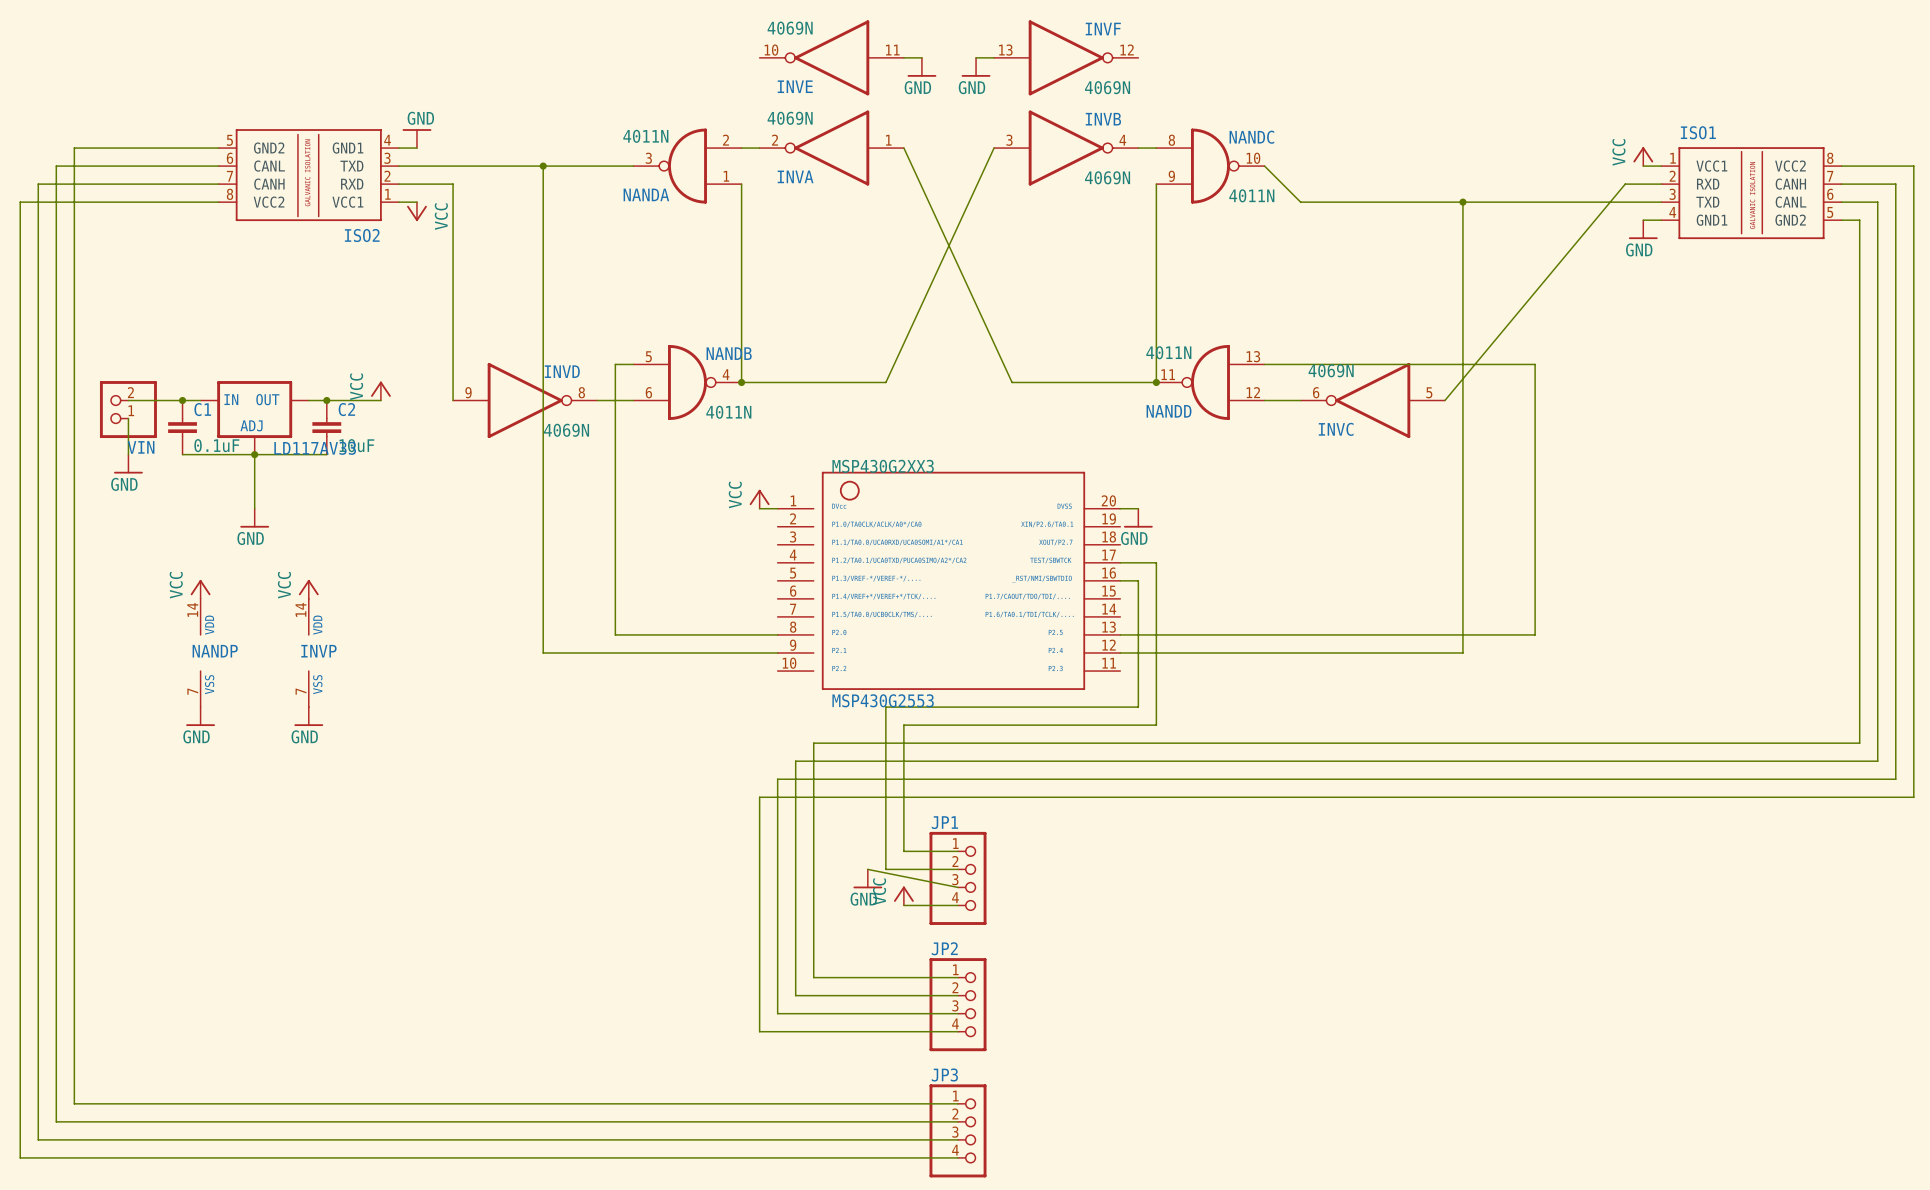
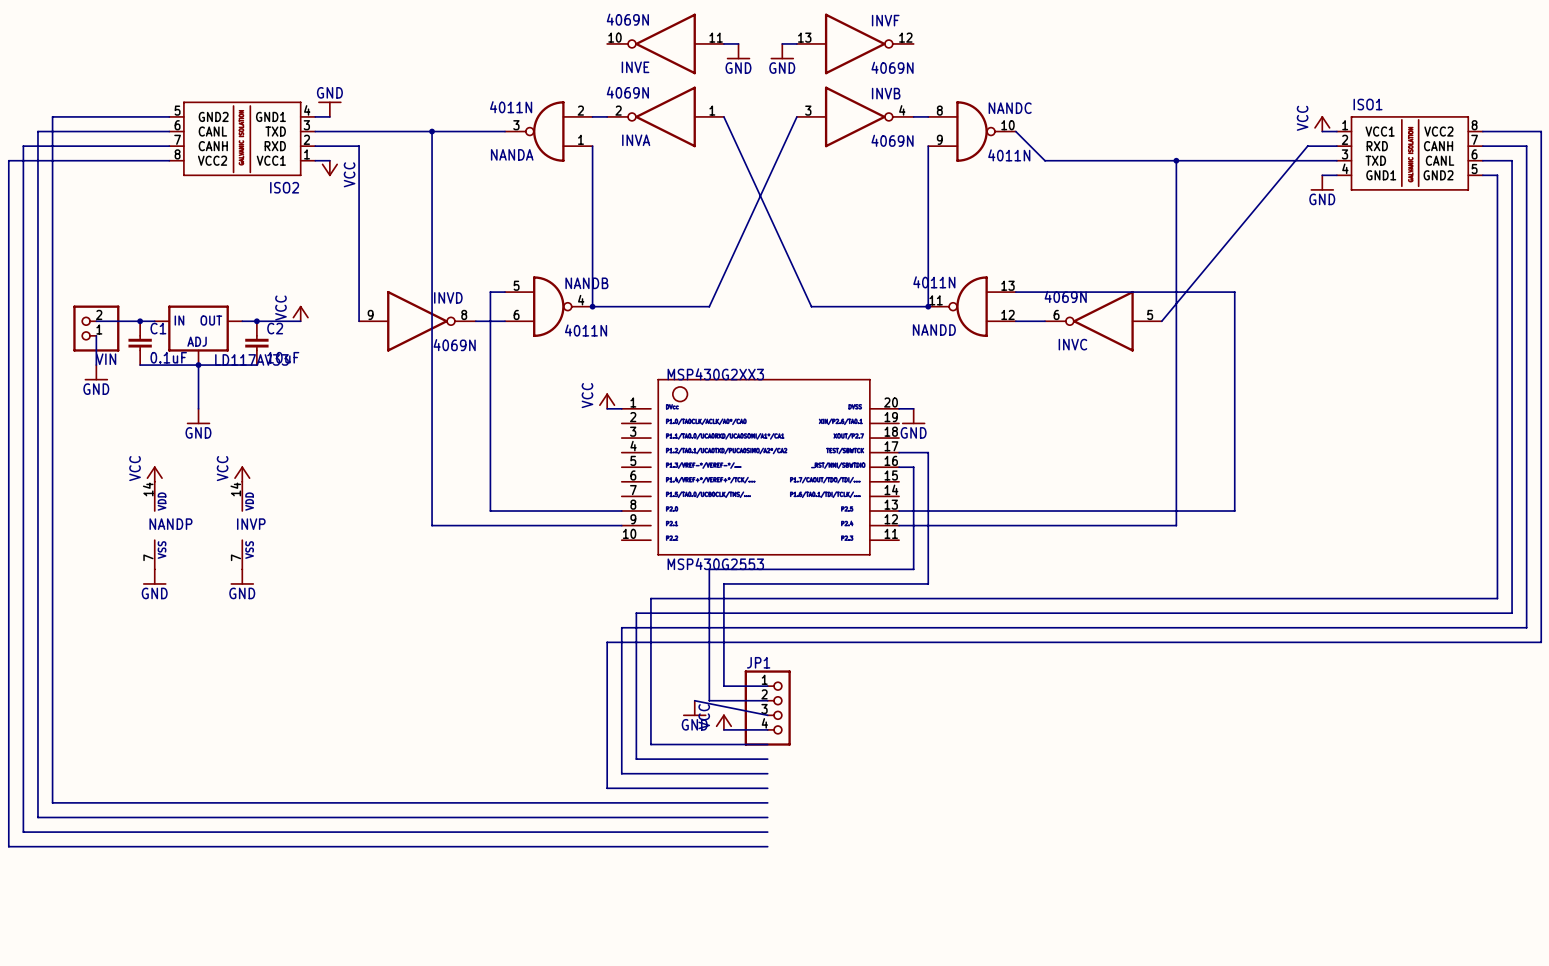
wire: (813, 923) (813, 977) -> (607, 788) (650, 788)
wire: none -> (650, 744) (767, 744)
wire: (795, 941) (795, 995) -> (636, 759) (767, 759)
wire: (777, 959) (777, 1013) -> (621, 773) (767, 773)
wire: (759, 977) (759, 1031) -> none
wire: (74, 995) (74, 1103) (958, 1103) -> (52, 802) (636, 802)
JP2: (958, 1004) -> none
wire: (56, 1013) (56, 1121) (958, 1121) -> (37, 817) (621, 817)
wire: (38, 1031) (38, 1139) (958, 1139) -> (23, 832) (607, 832)
wire: (20, 1049) (20, 1157) (958, 1157) -> (8, 846) (767, 846)
JP3: (958, 1130) -> none

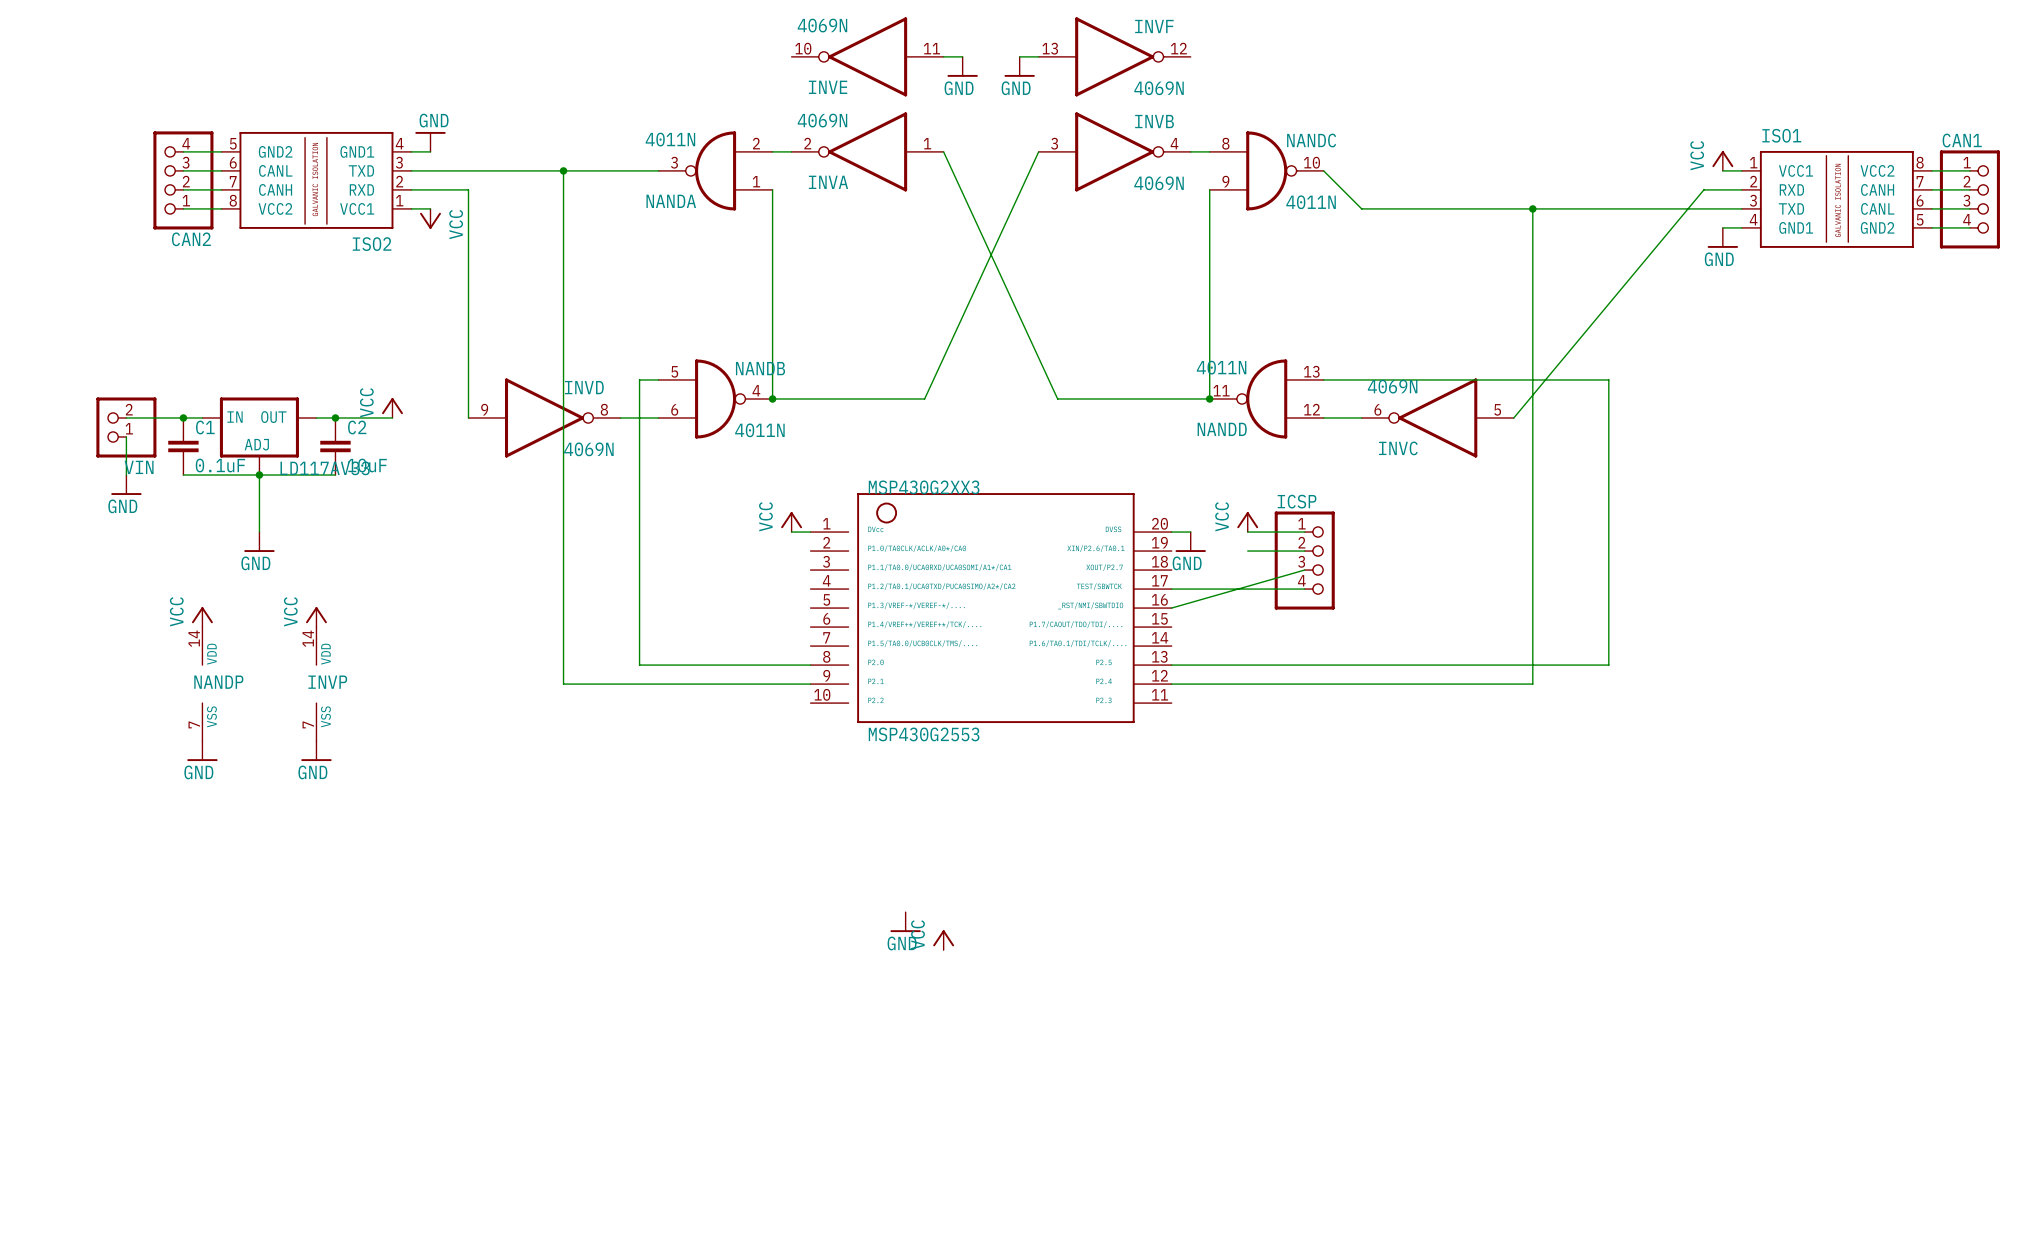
wire: (140, 116) (52, 116) (52, 802) (767, 802) -> none
wire: (140, 131) (37, 131) (37, 817) (767, 817) -> none
wire: (1512, 131) (1541, 131) (1541, 642) (607, 642) (607, 788) (767, 788) -> none
CAN2: none -> (183, 180)
wire: (140, 146) (23, 146) (23, 832) (767, 832) -> none
wire: (1512, 146) (1526, 146) (1526, 627) (621, 627) (621, 773) (767, 773) -> none
CAN1: none -> (1969, 199)
wire: (140, 160) (8, 160) (8, 846) (767, 846) -> none
wire: (1512, 160) (1512, 613) (636, 613) (636, 759) (767, 759) -> none
wire: (1497, 175) (1497, 598) (650, 598) (650, 744) (767, 744) -> (1950, 227) (1969, 227)
power symbol: none -> VCC (1247, 522)
wire: none -> (1247, 532) (1304, 532)
wire: none -> (1247, 551) (1304, 551)
ICSP: none -> (1304, 560)
wire: (928, 452) (928, 583) (723, 583) (723, 686) (767, 686) -> (1209, 589) (1304, 589)
wire: (899, 467) (913, 467) (913, 569) (709, 569) (709, 700) (767, 700) -> (1171, 608) (1304, 570)
wire: (694, 700) (767, 715) -> none
JP1: (767, 708) -> none
wire: (723, 729) (767, 729) -> none

